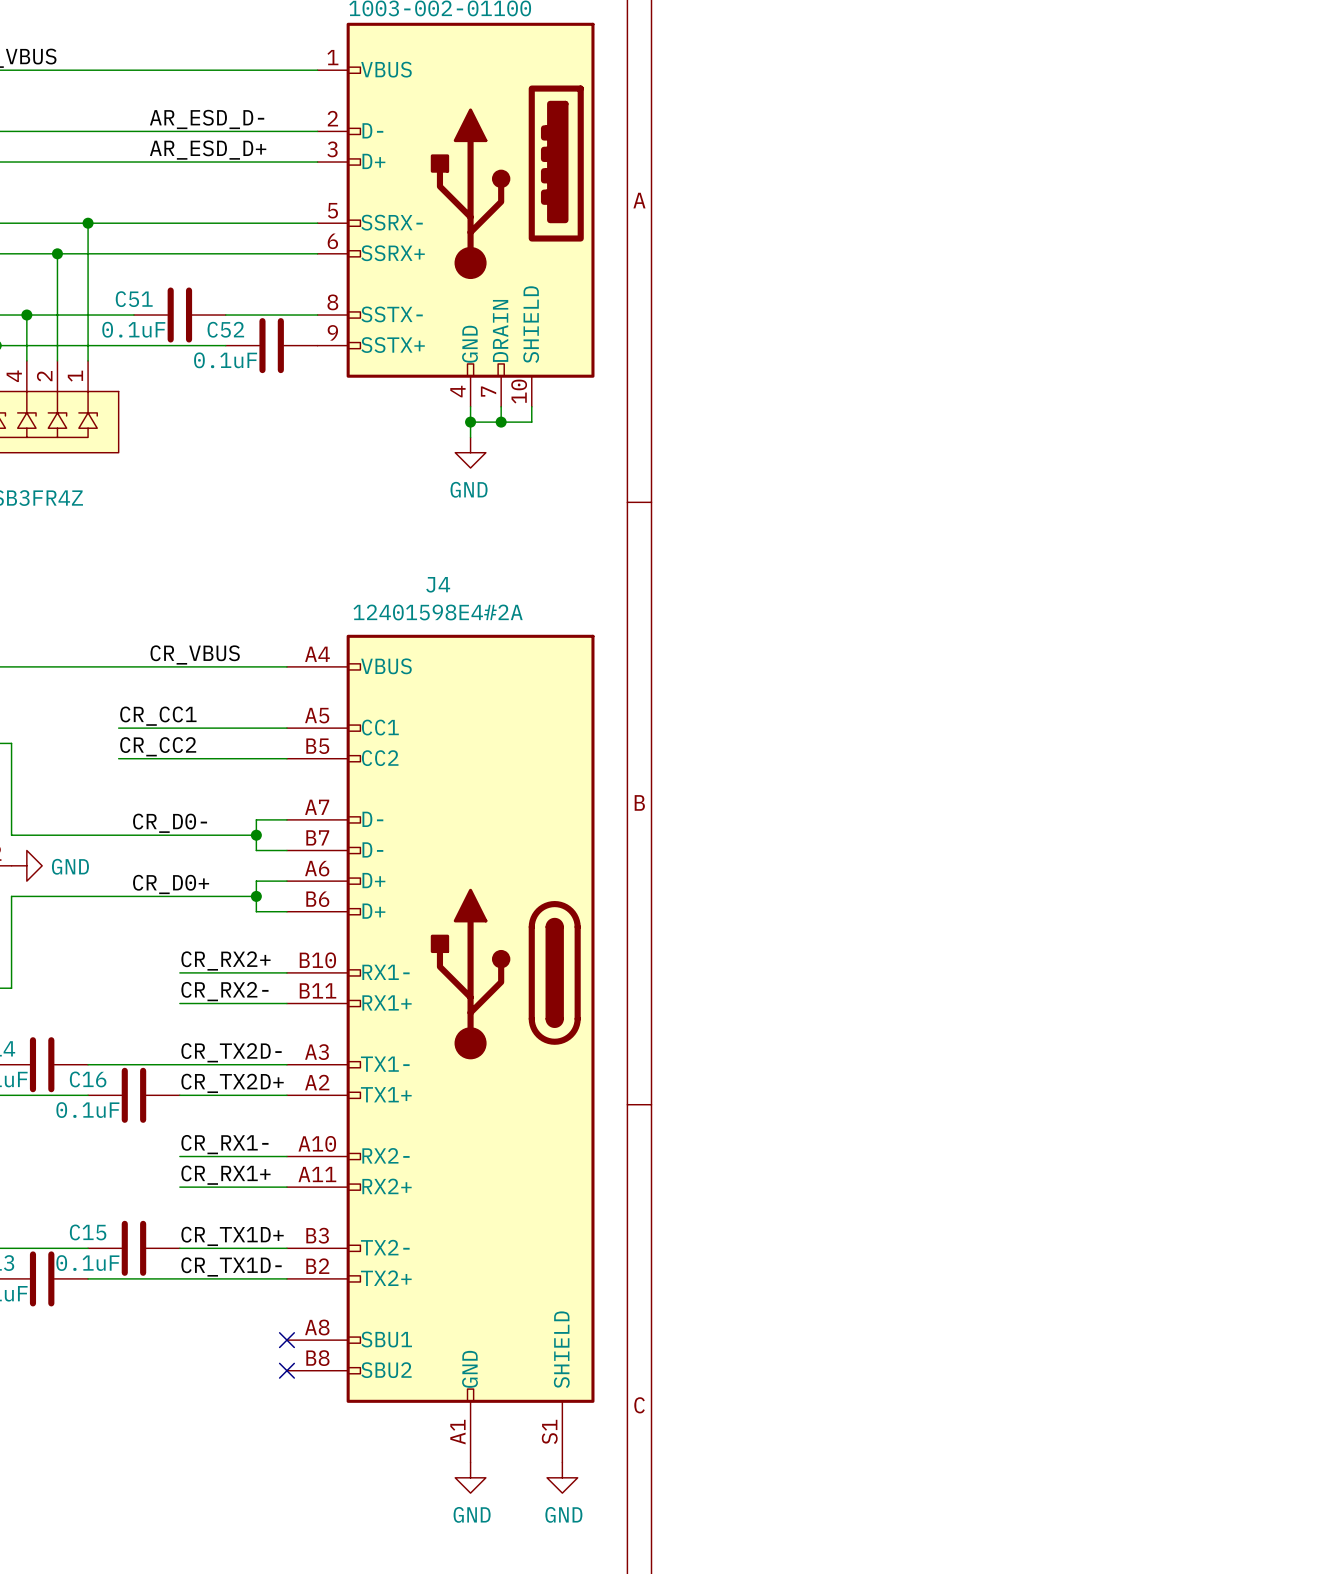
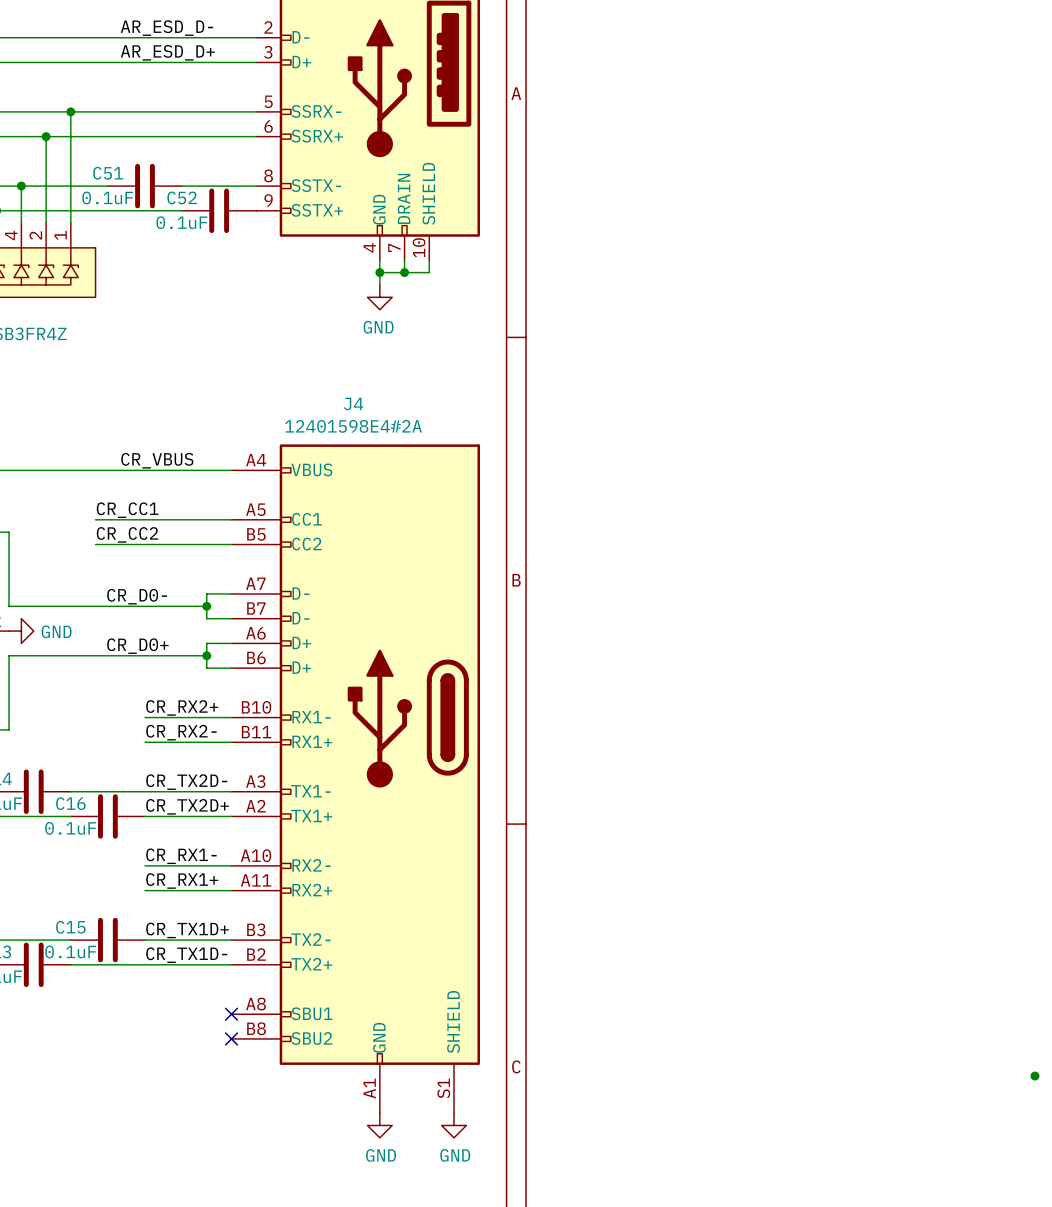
junction: none -> (1034, 1076)

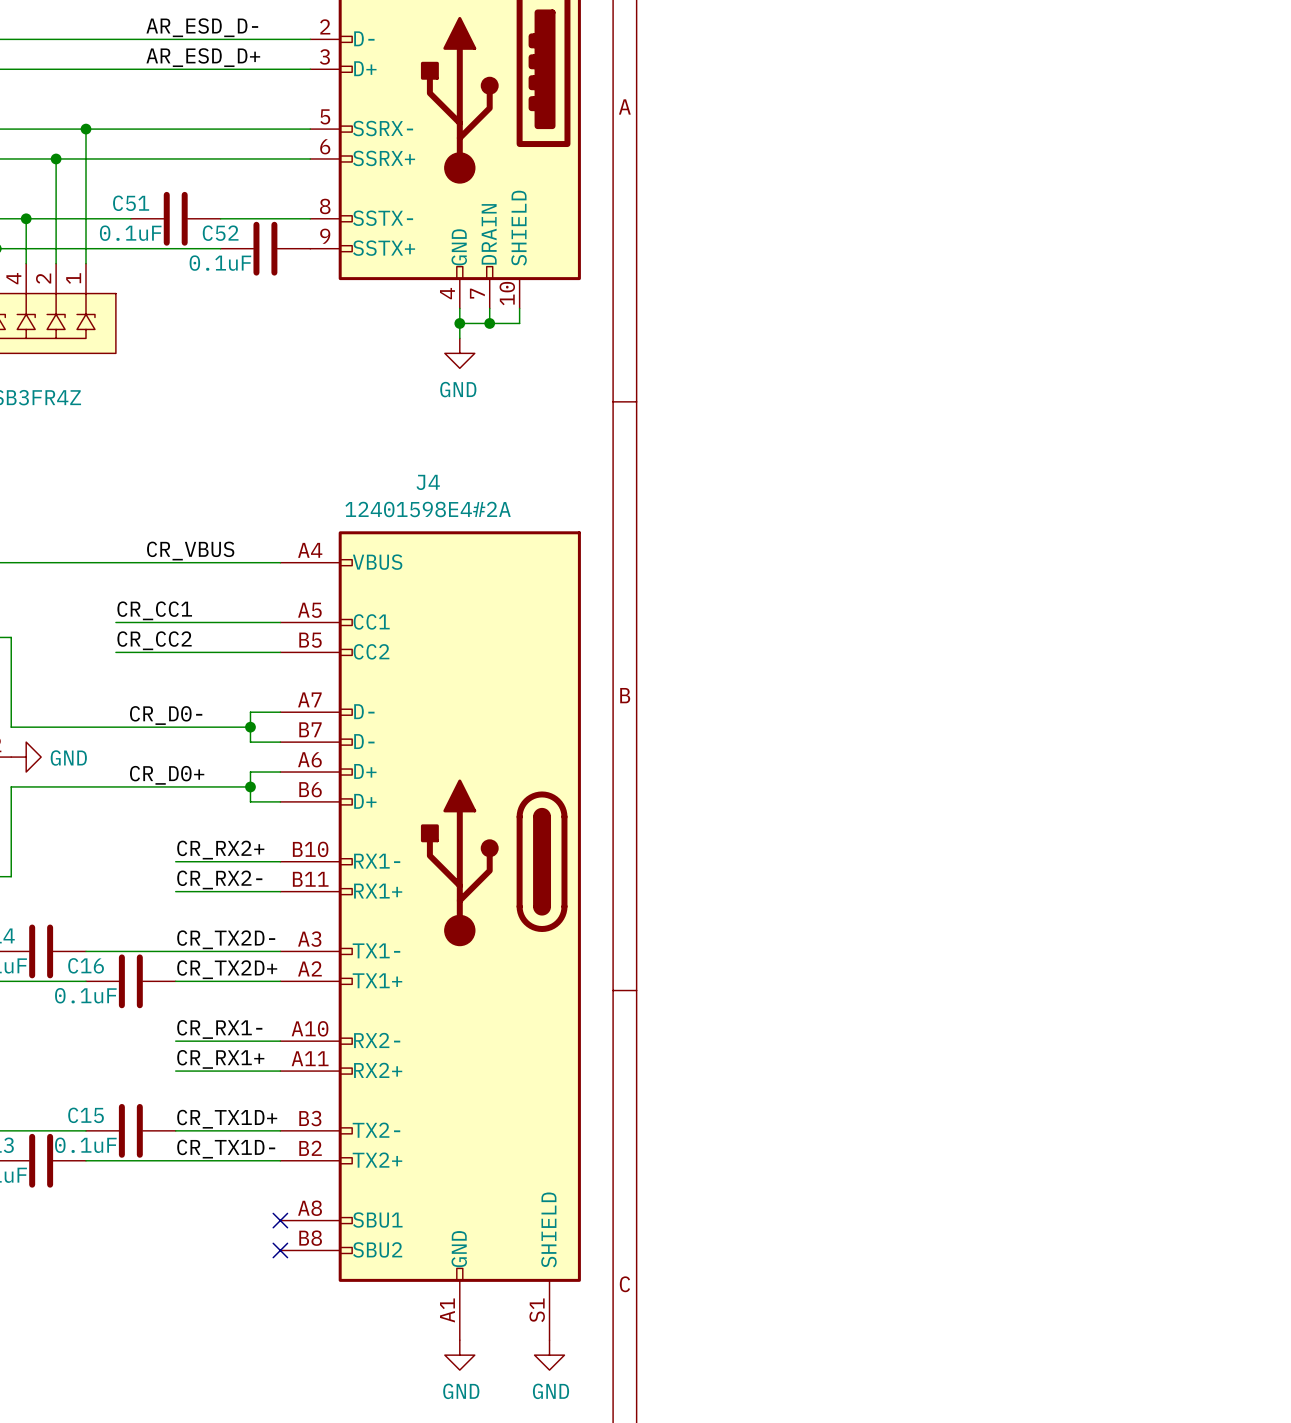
junction: (1034, 1076) -> none

